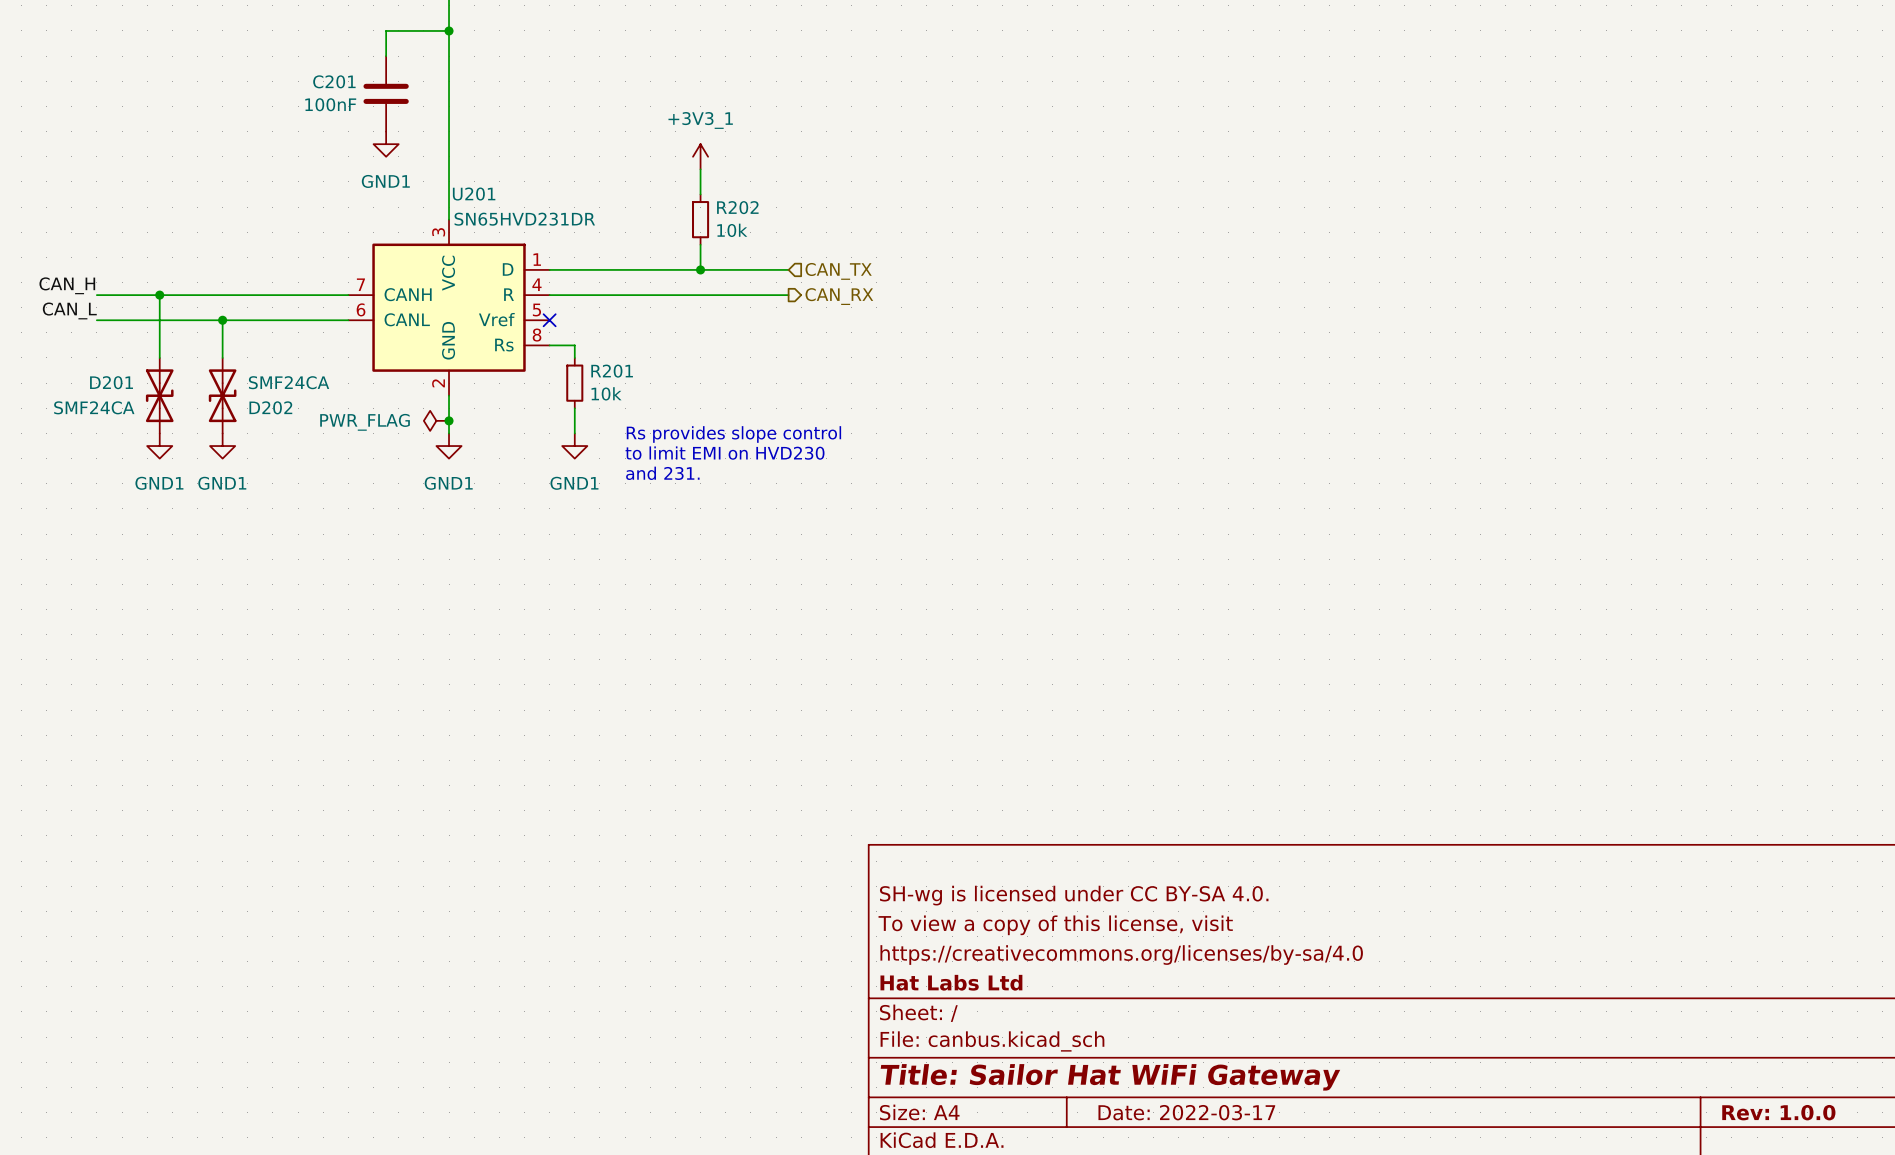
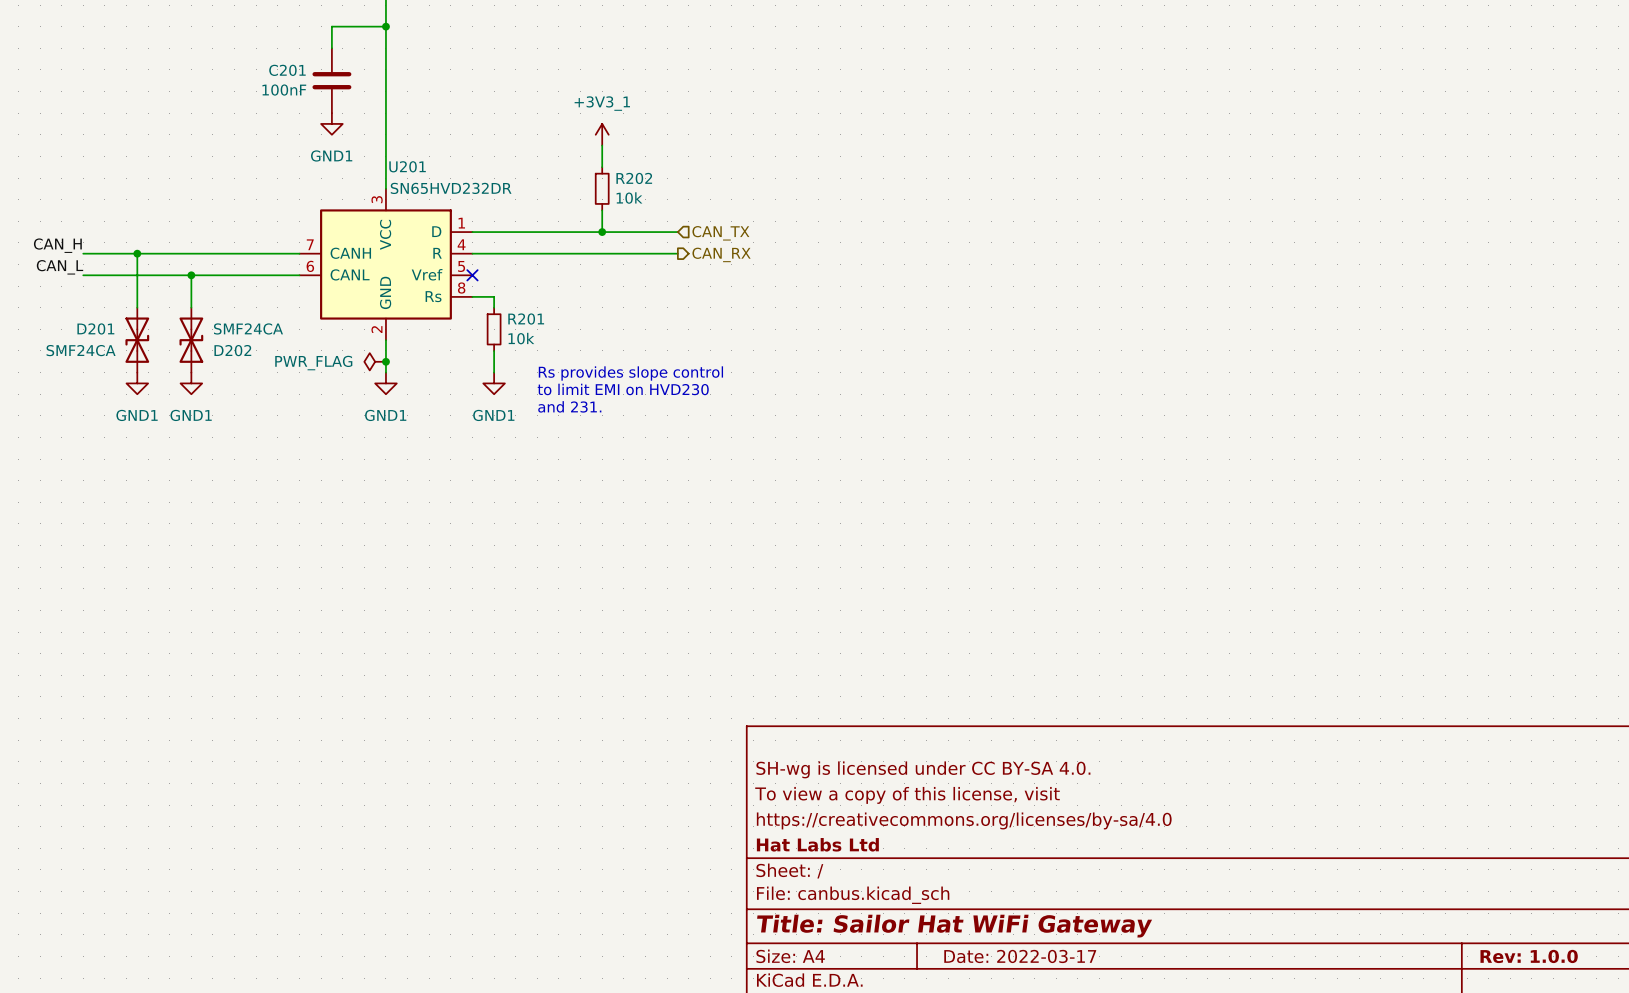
U201 value: SN65HVD231DR (524, 219) -> SN65HVD232DR (451, 188)

